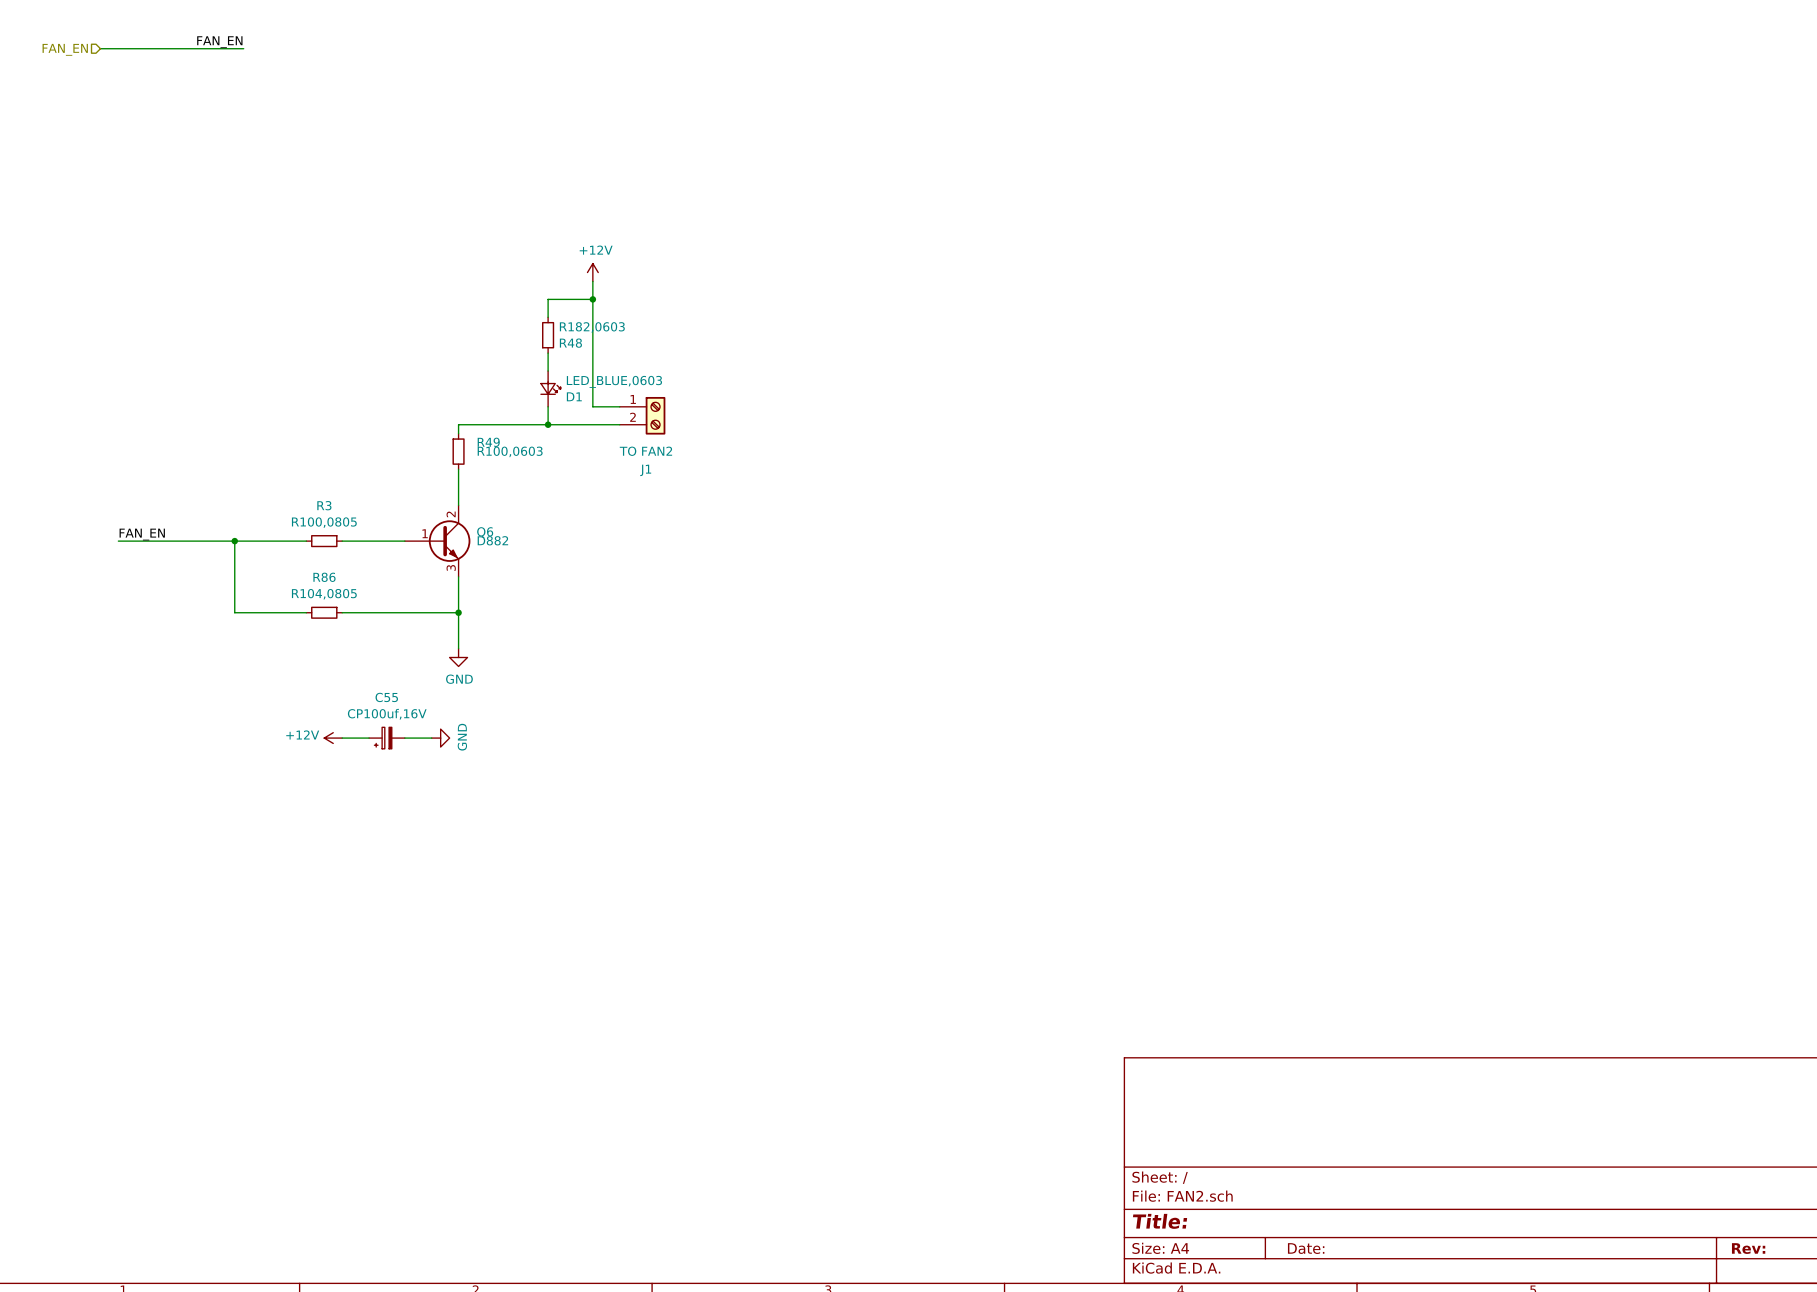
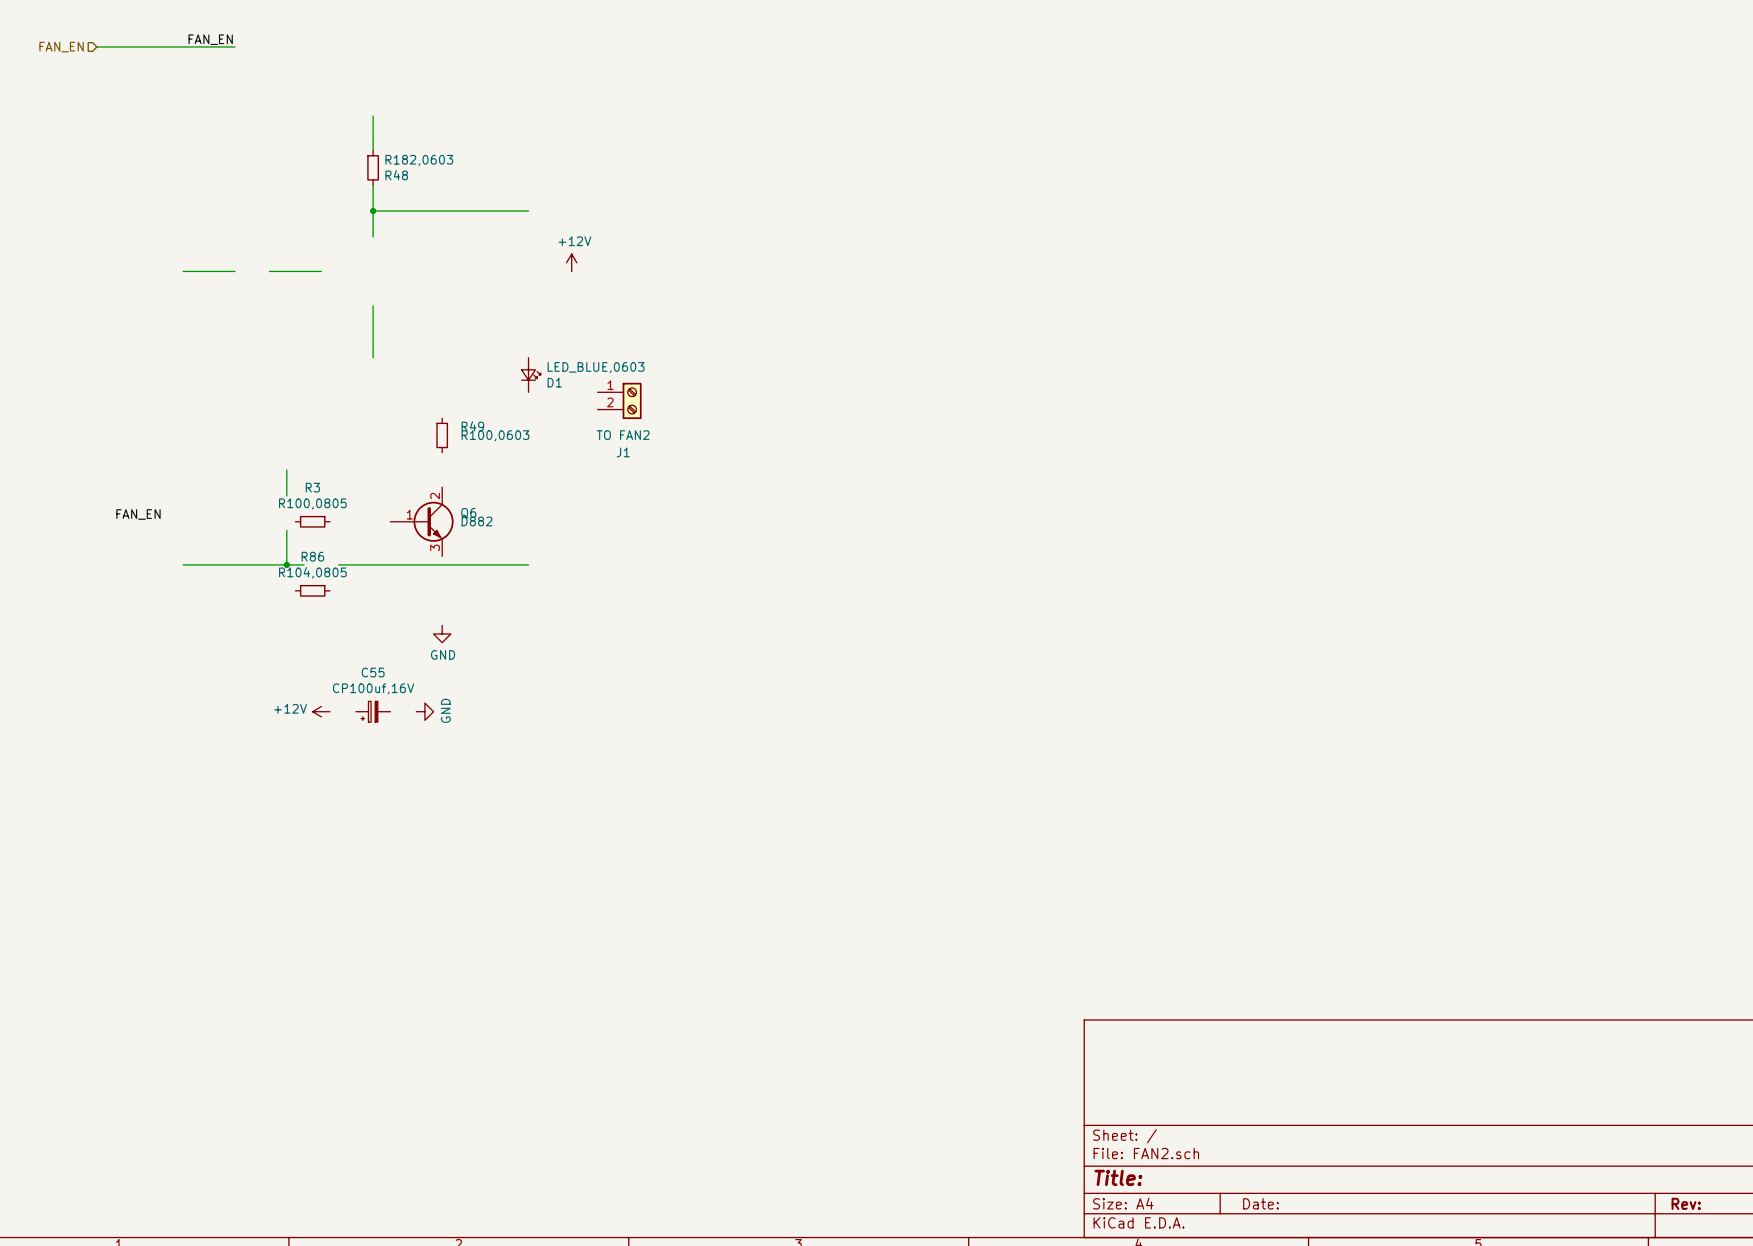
wire: none -> (373, 116) (373, 150)
wire: none -> (373, 185) (373, 236)
wire: none -> (373, 211) (528, 211)
junction: none -> (373, 211)
wire: none -> (183, 271) (235, 271)
wire: none -> (269, 271) (321, 271)
wire: (592, 281) (592, 406) (619, 406) -> none
wire: (592, 299) (548, 299) (548, 317) -> none
junction: (592, 299) -> none
wire: none -> (373, 305) (373, 357)
R48 position: (548, 335) -> (373, 167)
wire: (548, 353) (548, 371) -> none
wire: (548, 406) (548, 424) -> none
junction: (548, 424) -> none
wire: (619, 424) (458, 424) (458, 433) -> none
wire: (458, 469) (458, 505) -> none
wire: none -> (286, 469) (286, 495)
wire: (118, 541) (306, 541) -> none
wire: (234, 541) (234, 612) (306, 612) -> none
junction: (234, 541) -> none
wire: (342, 541) (404, 541) -> none
wire: none -> (286, 530) (286, 564)
wire: (458, 576) (458, 648) -> none
wire: none -> (183, 564) (304, 564)
junction: none -> (286, 564)
wire: none -> (338, 564) (528, 564)
wire: (342, 612) (458, 612) -> none
junction: (458, 612) -> none
wire: (342, 738) (369, 738) -> none
wire: (404, 738) (431, 738) -> none

